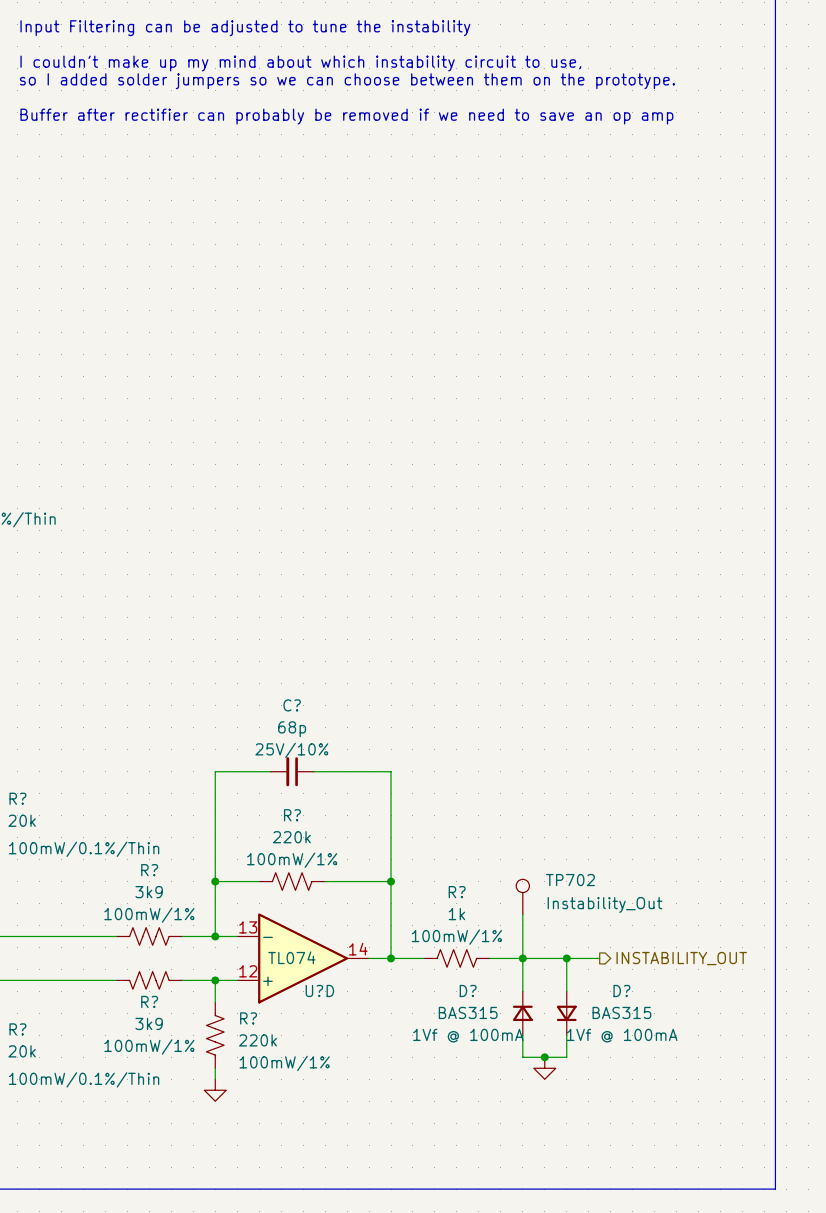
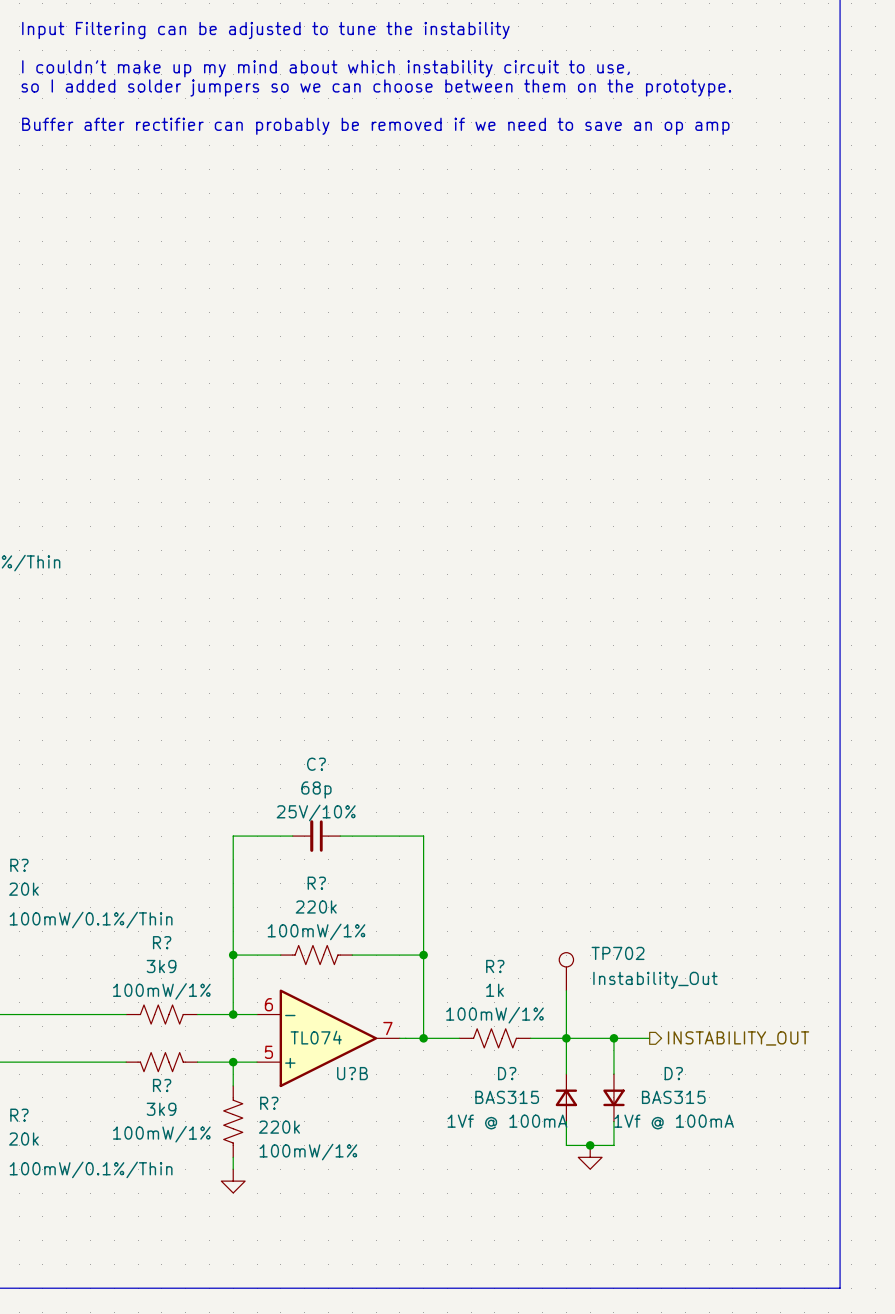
U?D pin number: 13 (248, 927) -> 6 (268, 1004)
U?D pin number: 14 (358, 949) -> 7 (387, 1028)
U?D pin number: 12 (248, 971) -> 5 (268, 1052)
U?D name: U?D (319, 990) -> U?B (352, 1073)

